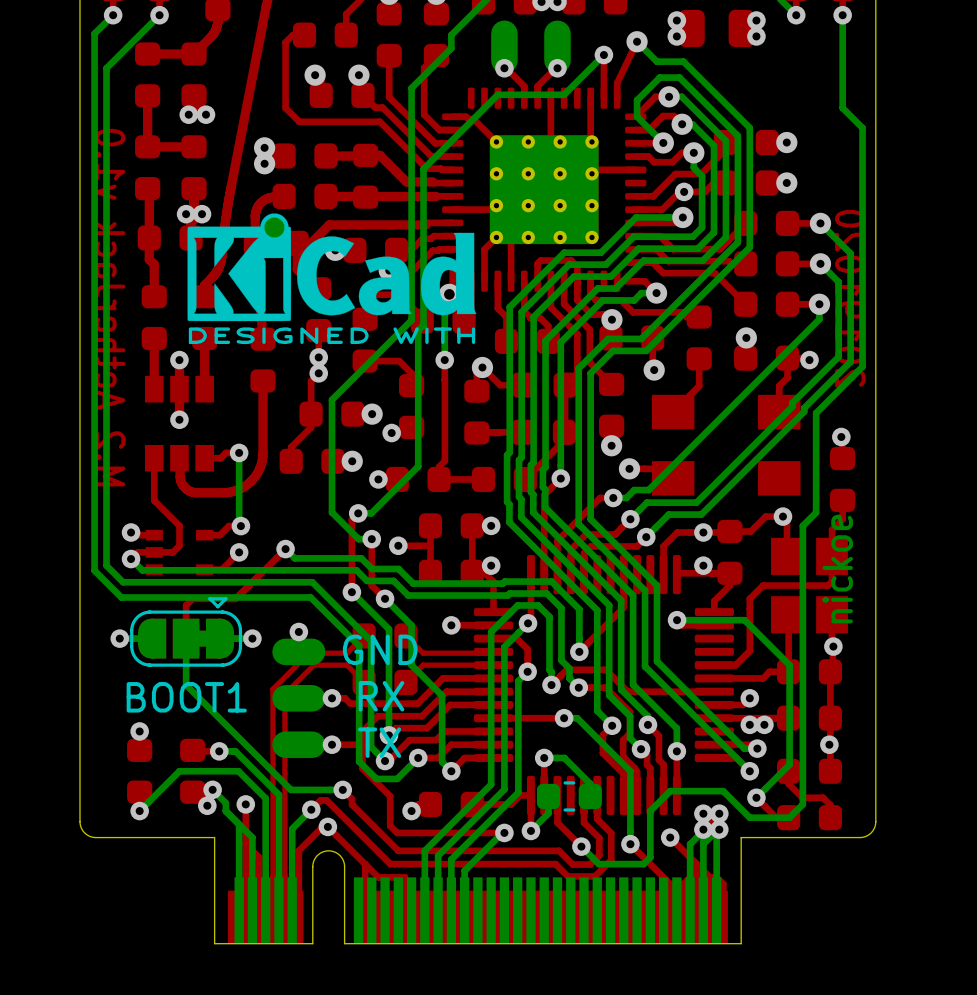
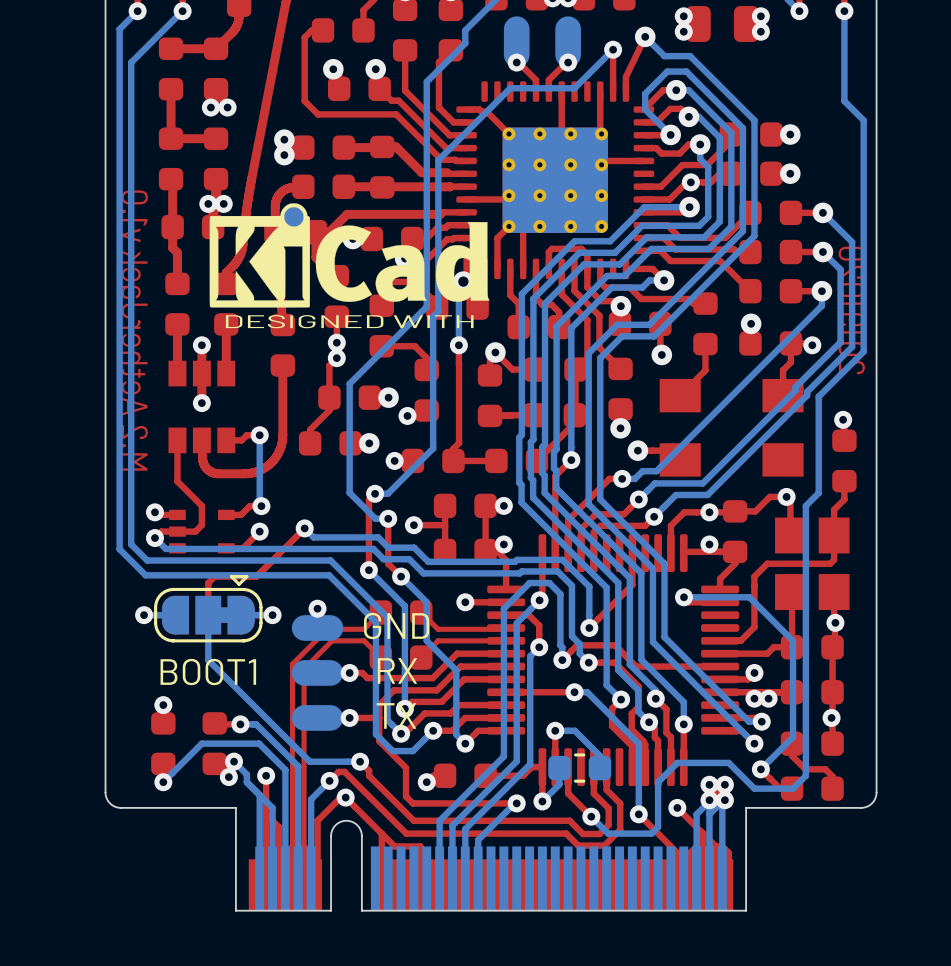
text: nickoe (837, 569) -> none

